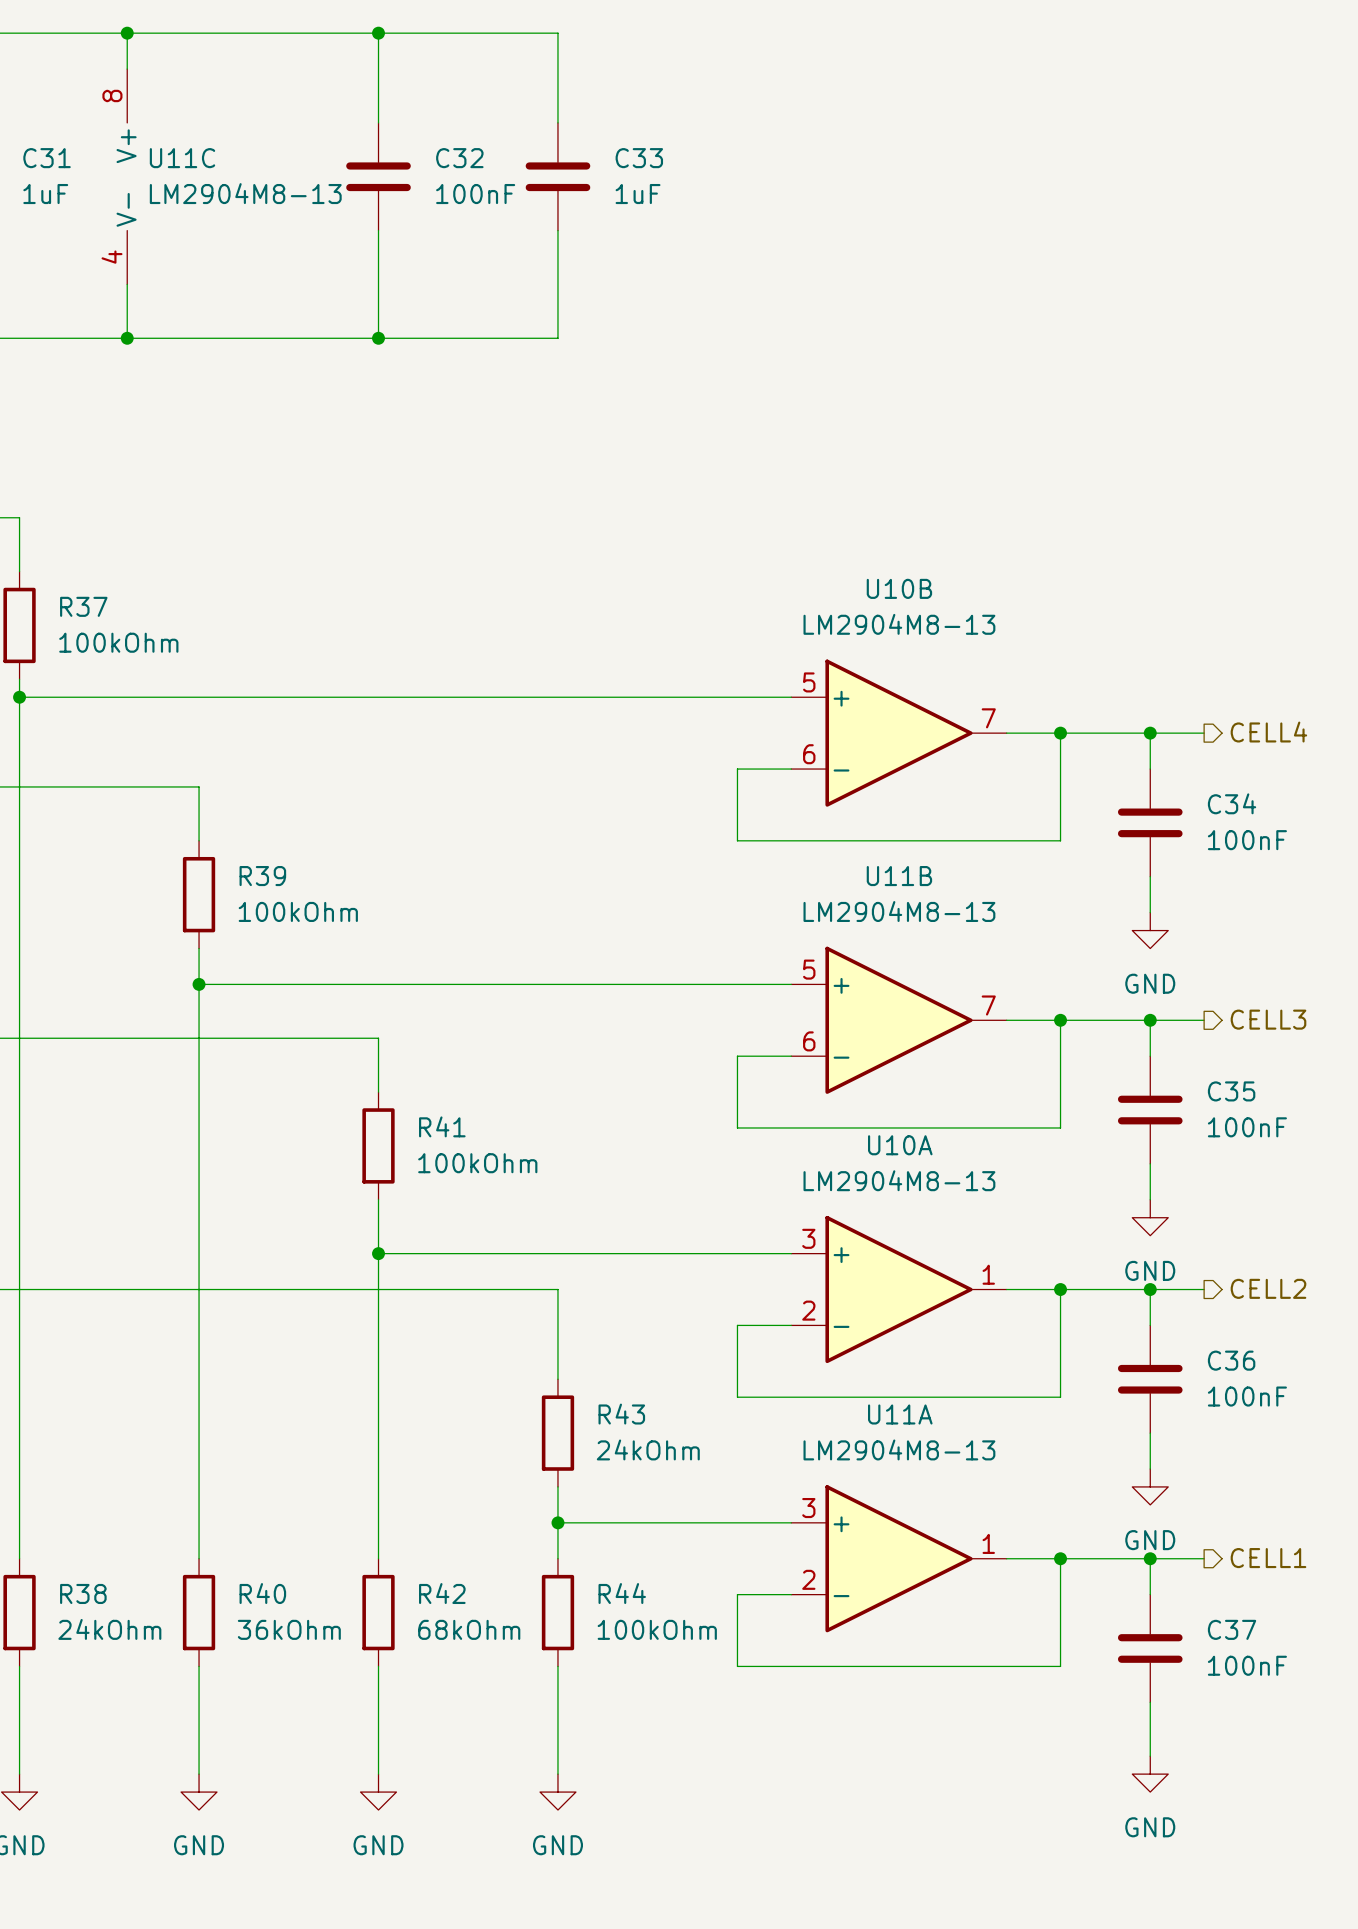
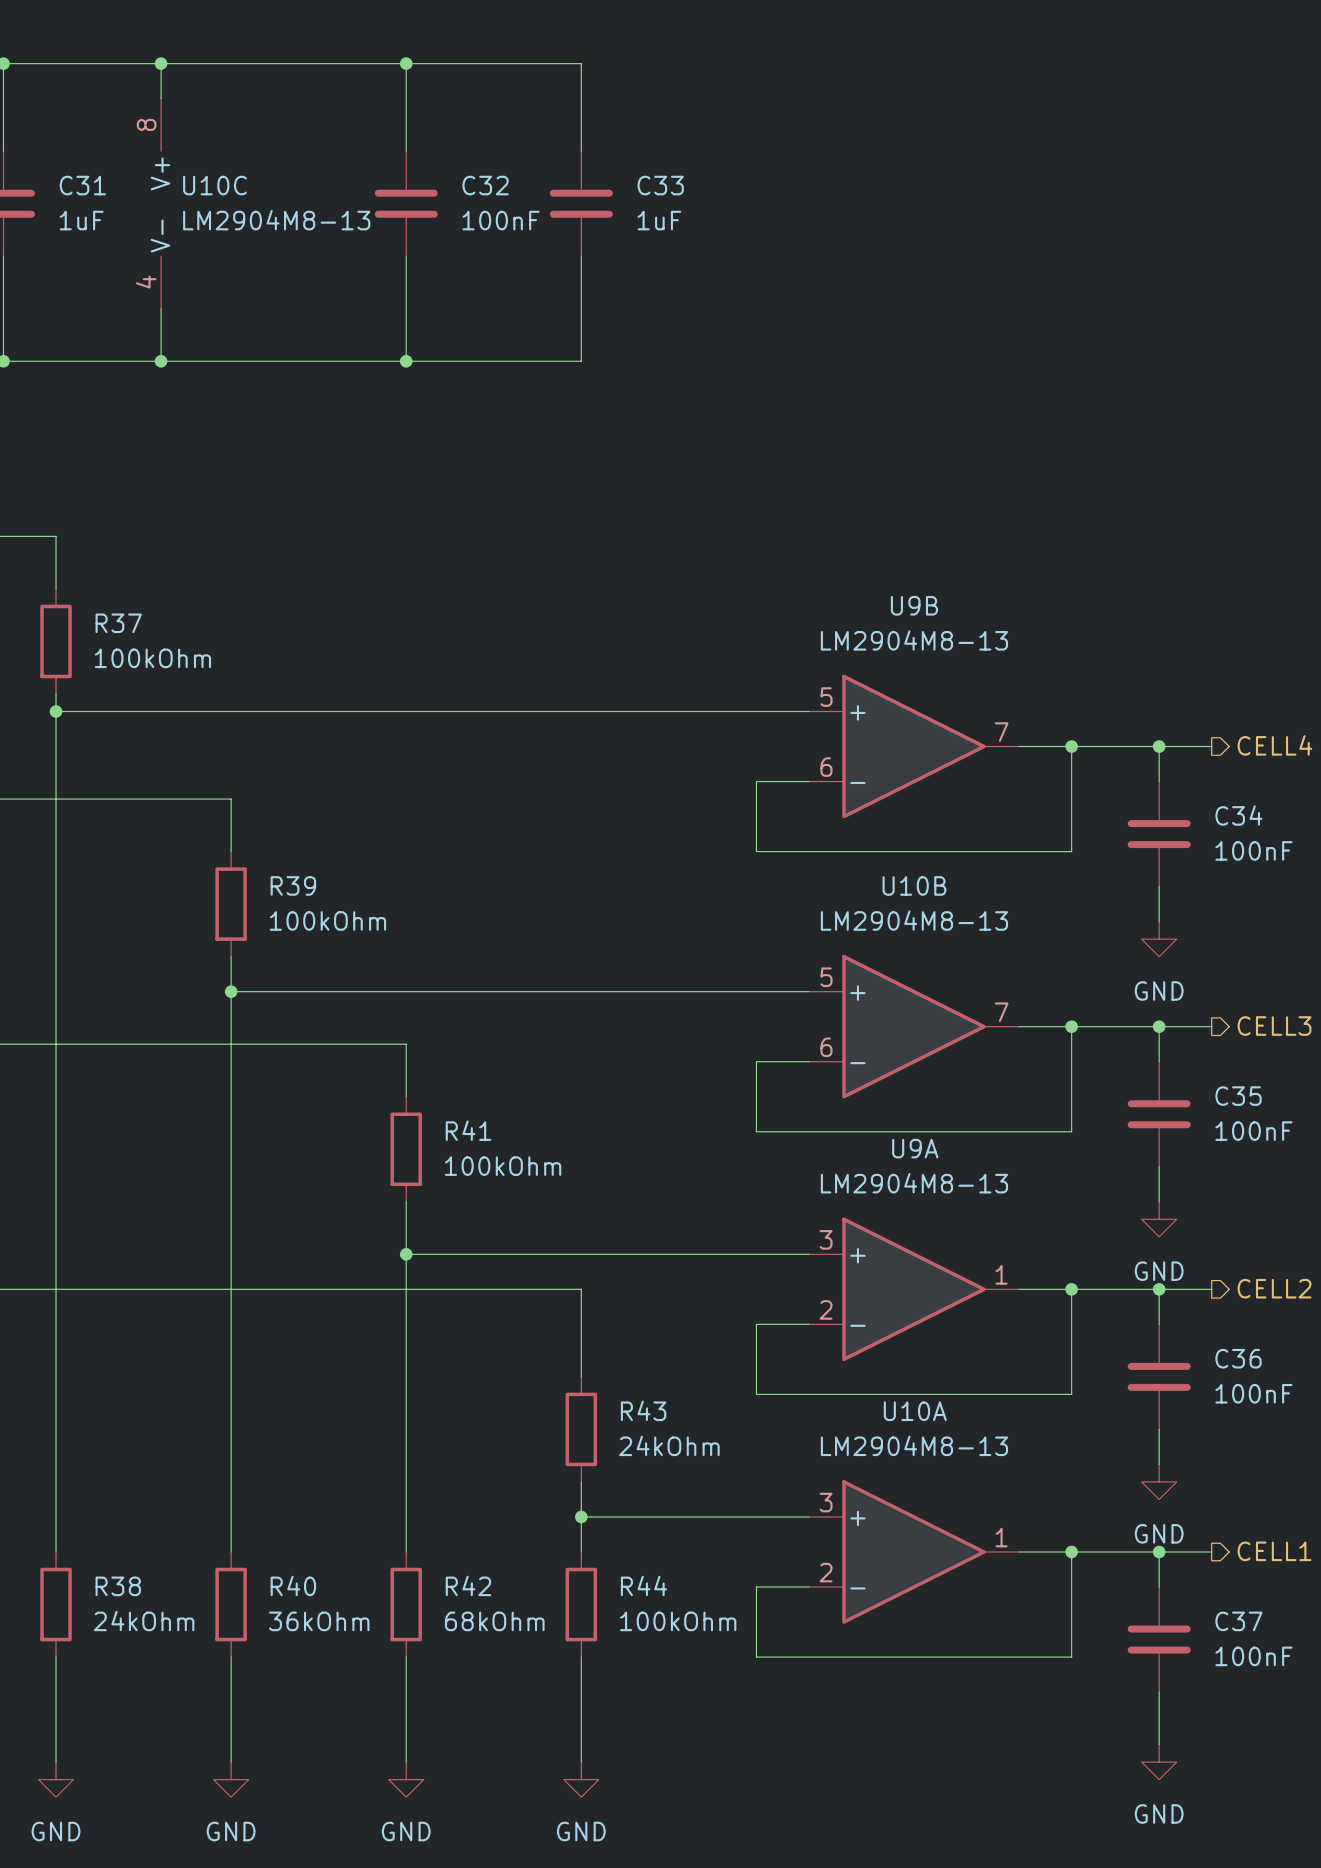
U11C name: U11C (182, 158) -> U10C (215, 185)
U10B name: U10B (899, 588) -> U9B (914, 605)
U11B name: U11B (899, 876) -> U10B (914, 885)
U10A name: U10A (900, 1145) -> U9A (915, 1148)
U11A name: U11A (900, 1414) -> U10A (915, 1411)

